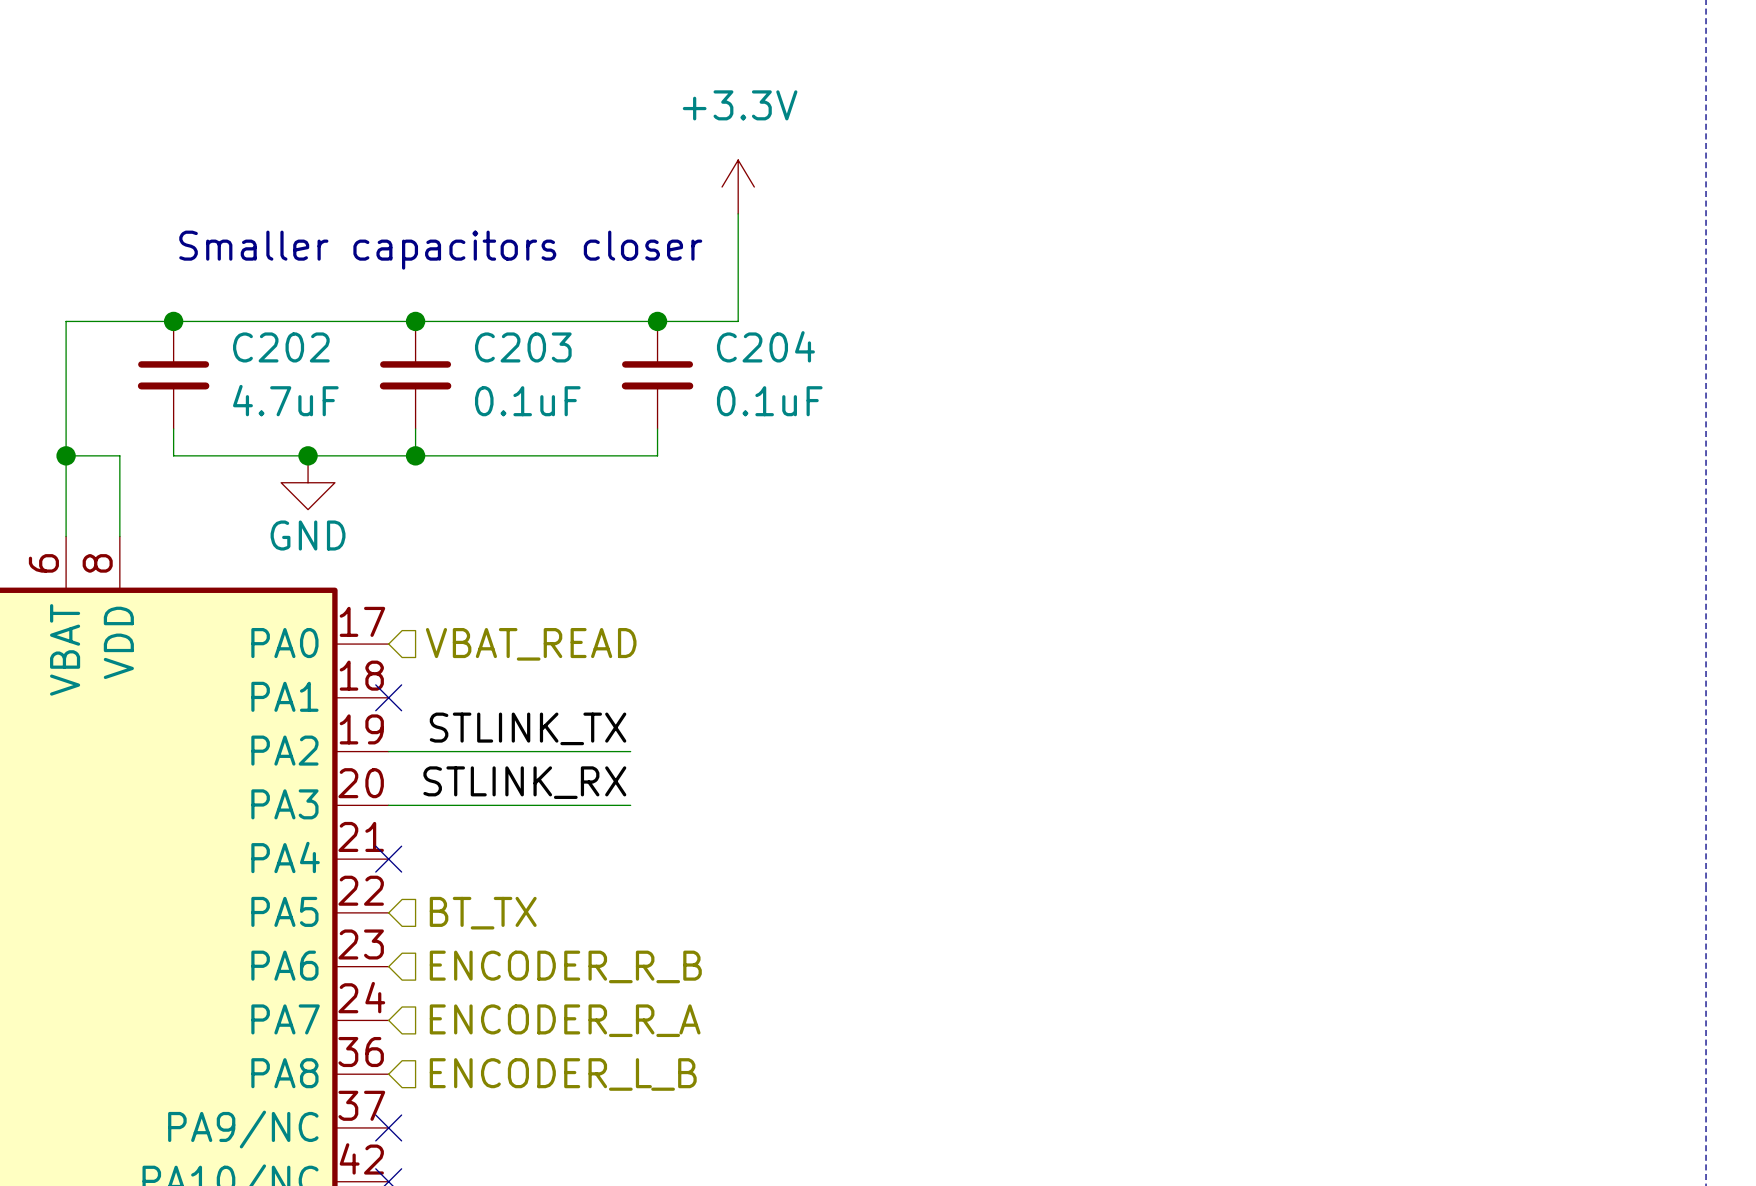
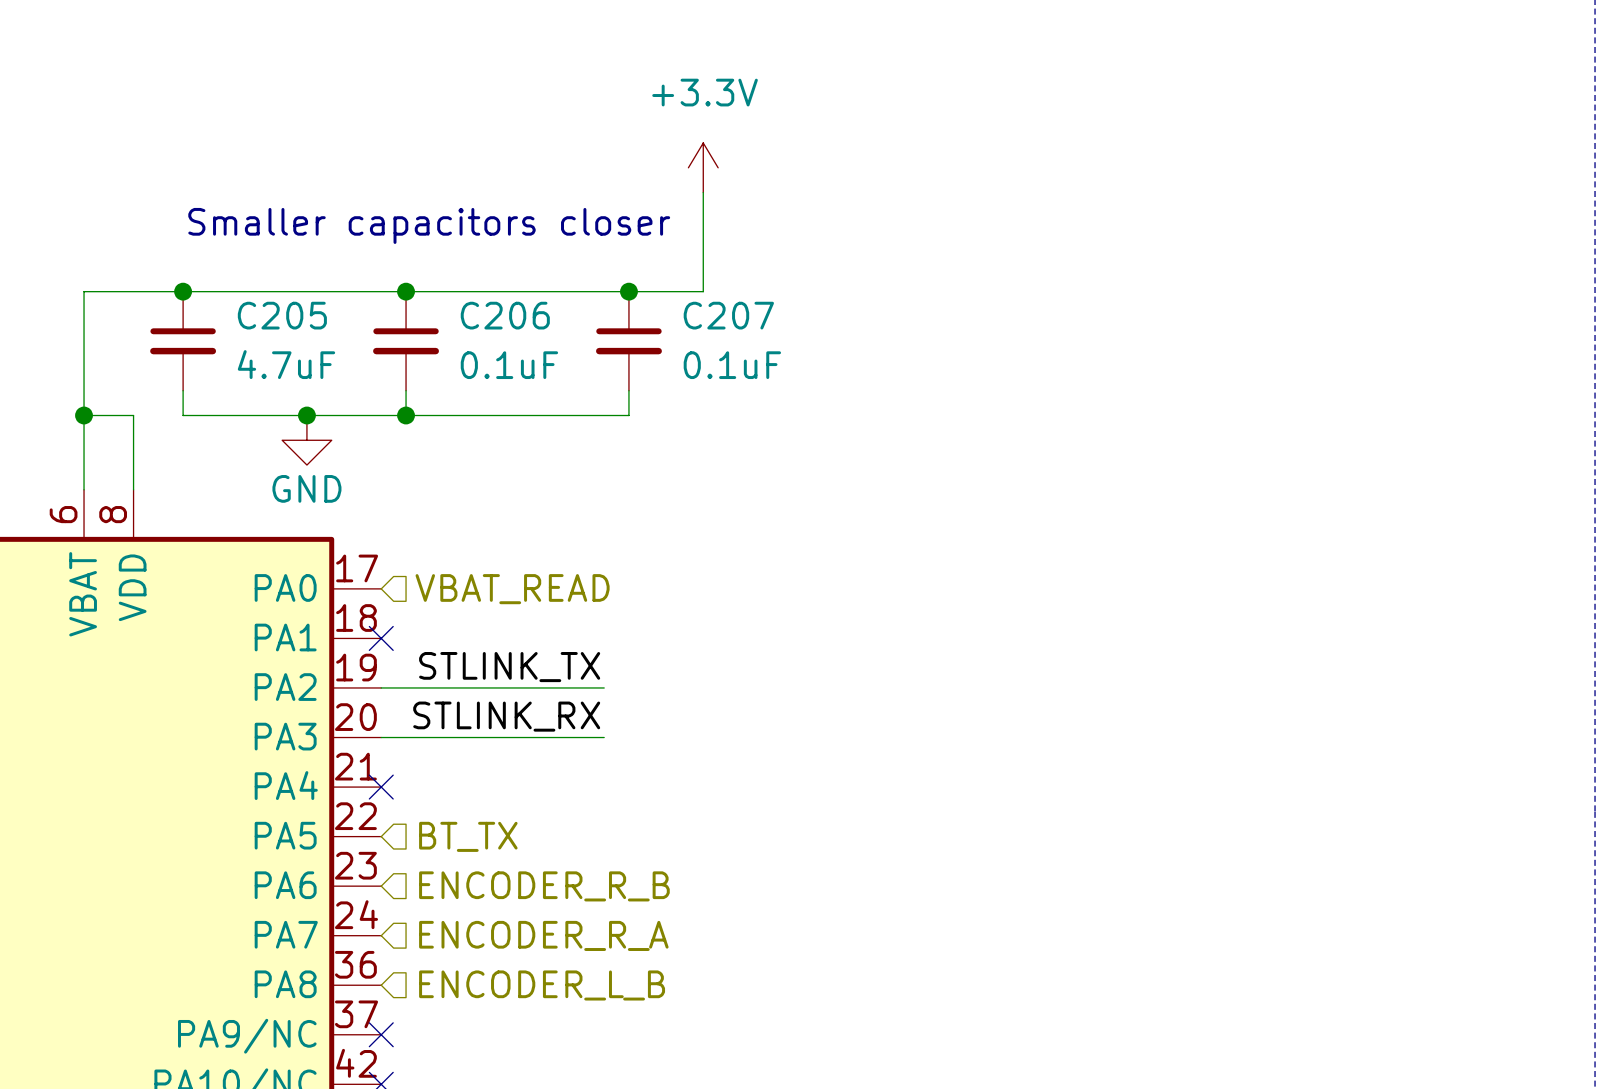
C204 name: C204 (765, 346) -> C207 (728, 315)
C202 name: C202 (281, 347) -> C205 (282, 315)
C203 name: C203 (523, 347) -> C206 (505, 315)

